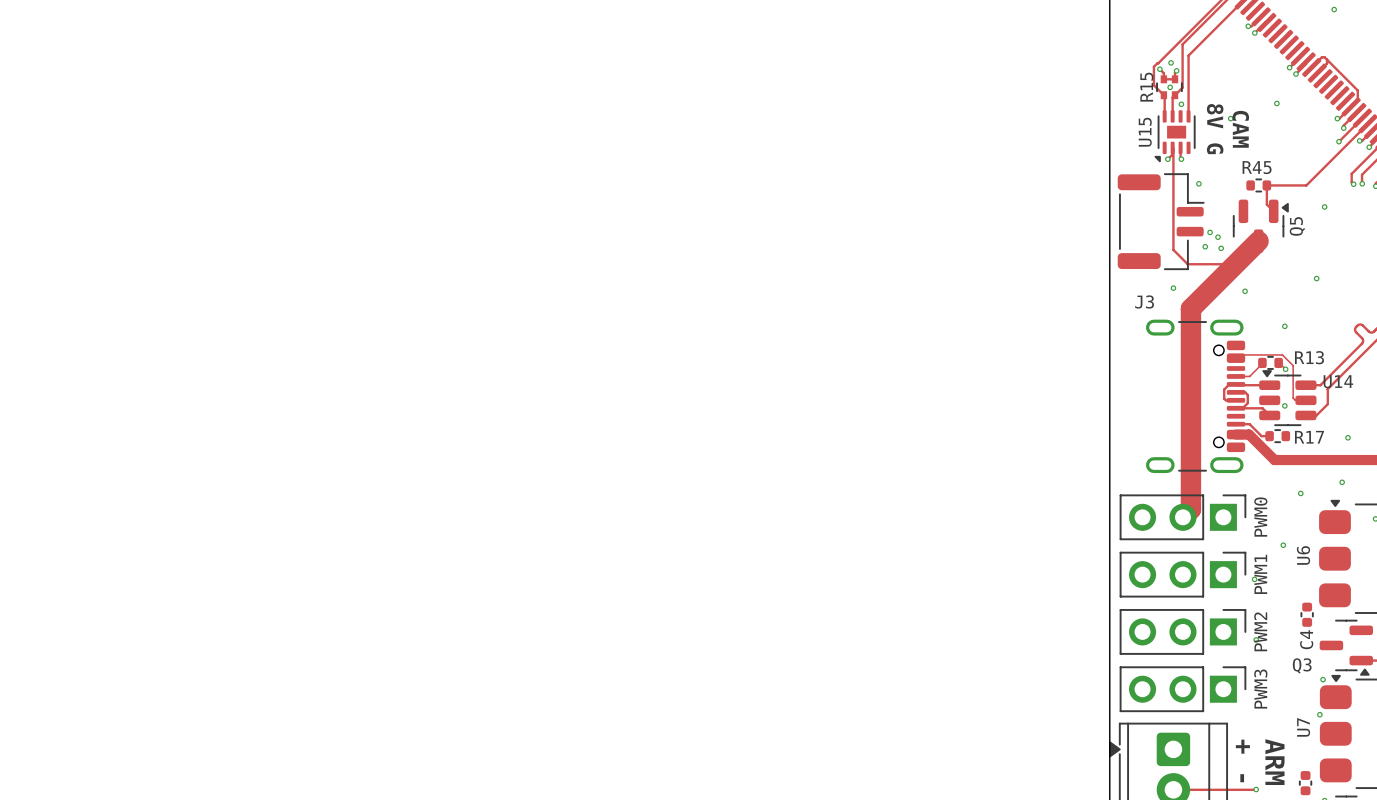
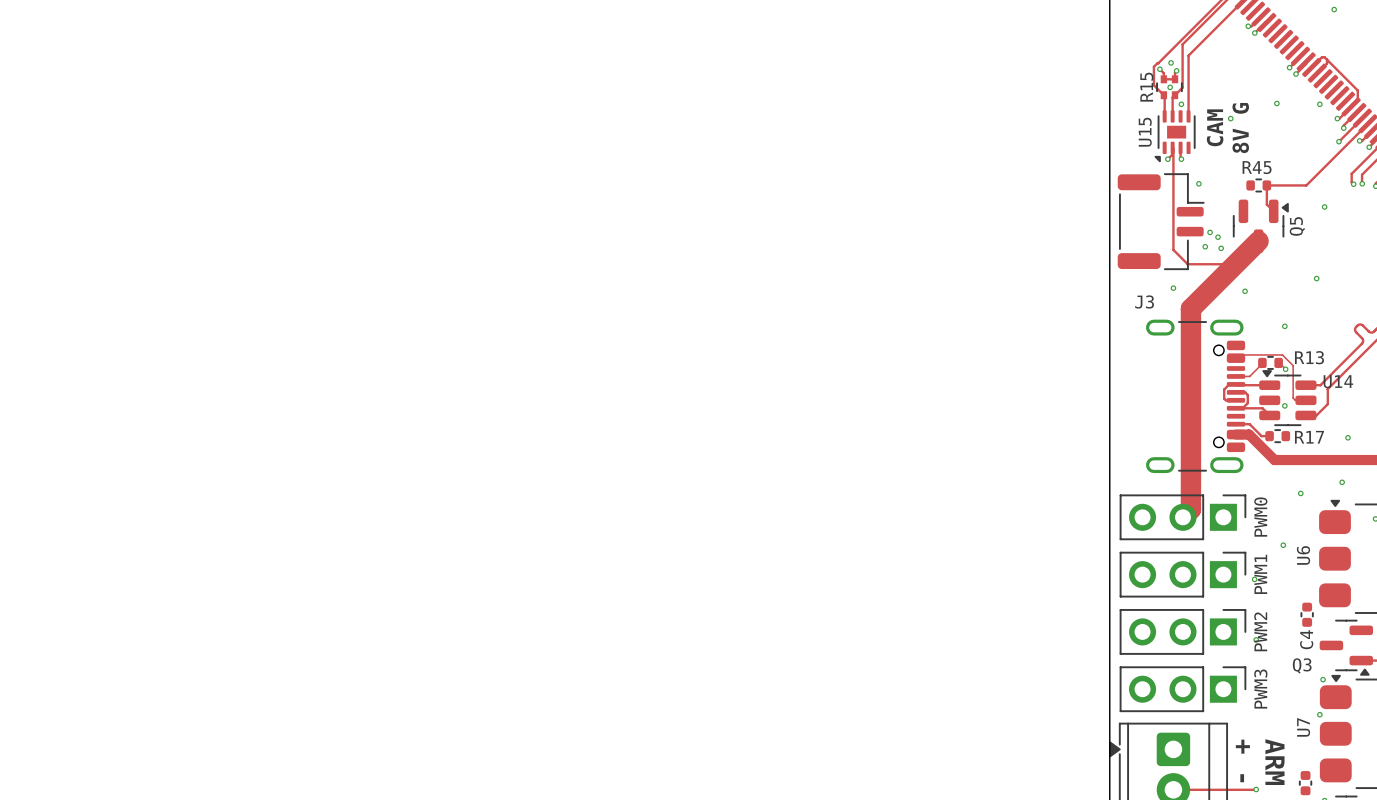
via: none -> (1319, 104)
text rotation: 0° (1215, 129) -> 180° (1240, 128)
text rotation: 0° (1240, 129) -> 180° (1215, 127)

